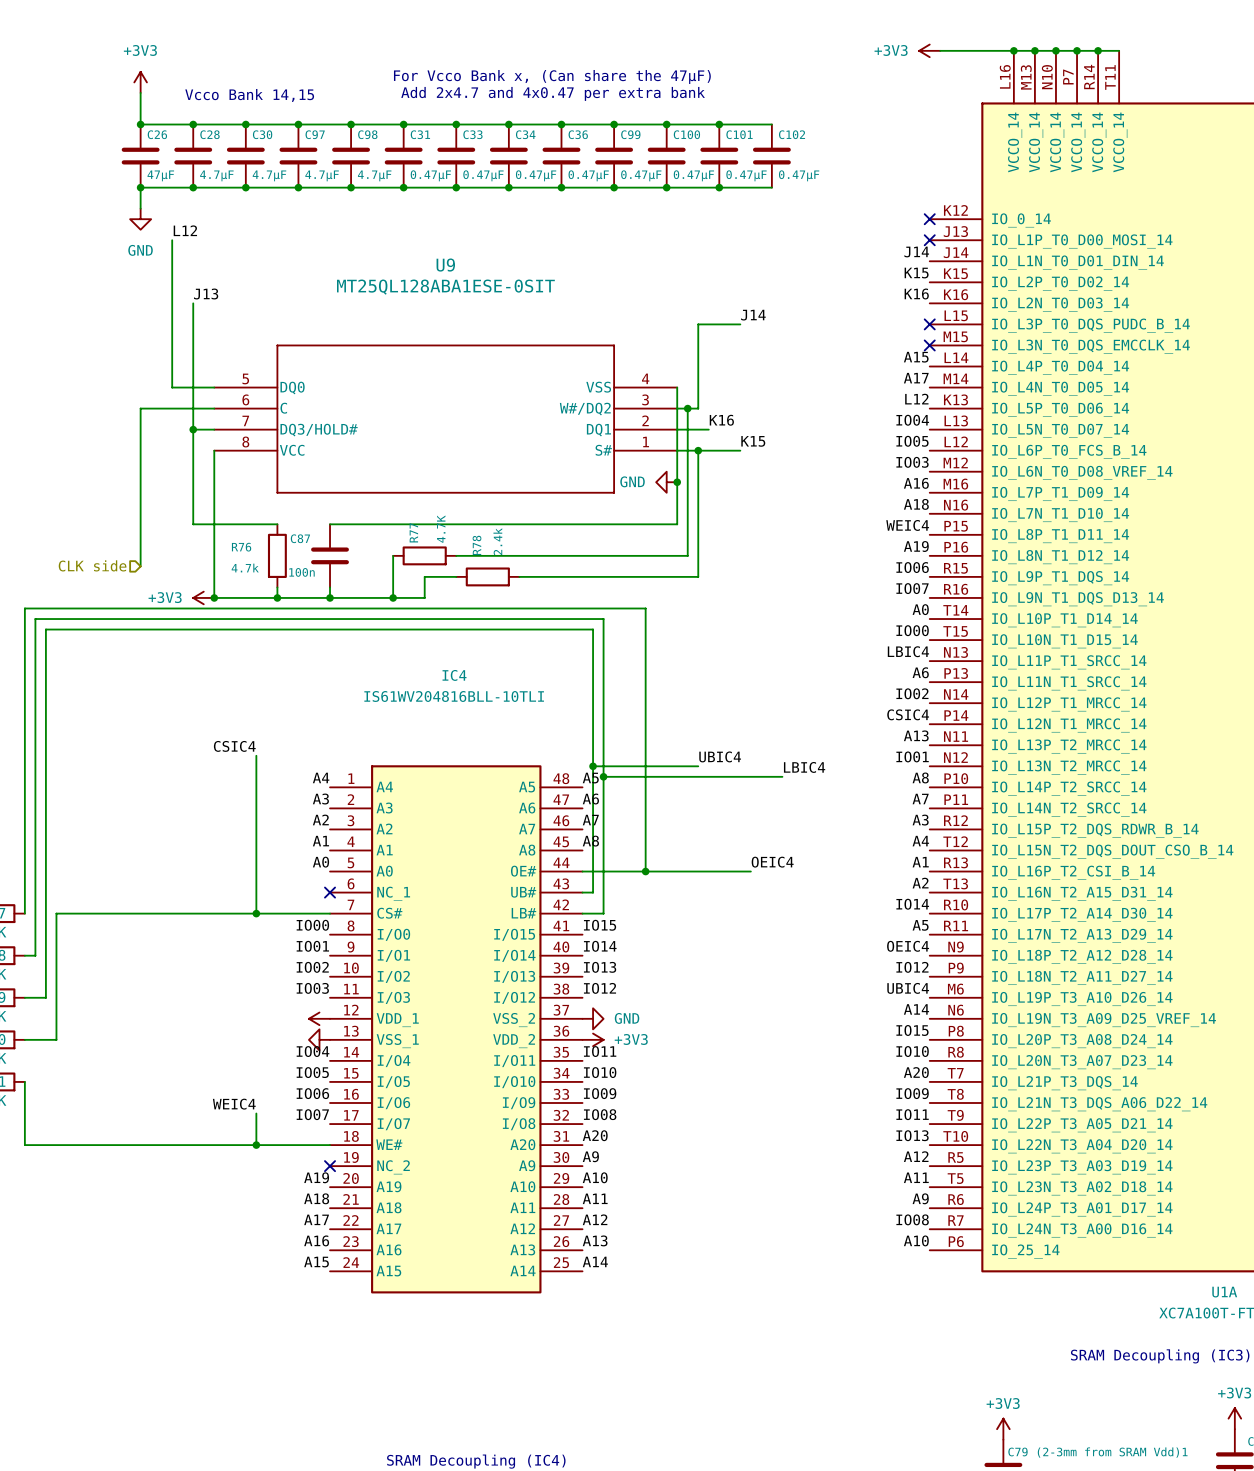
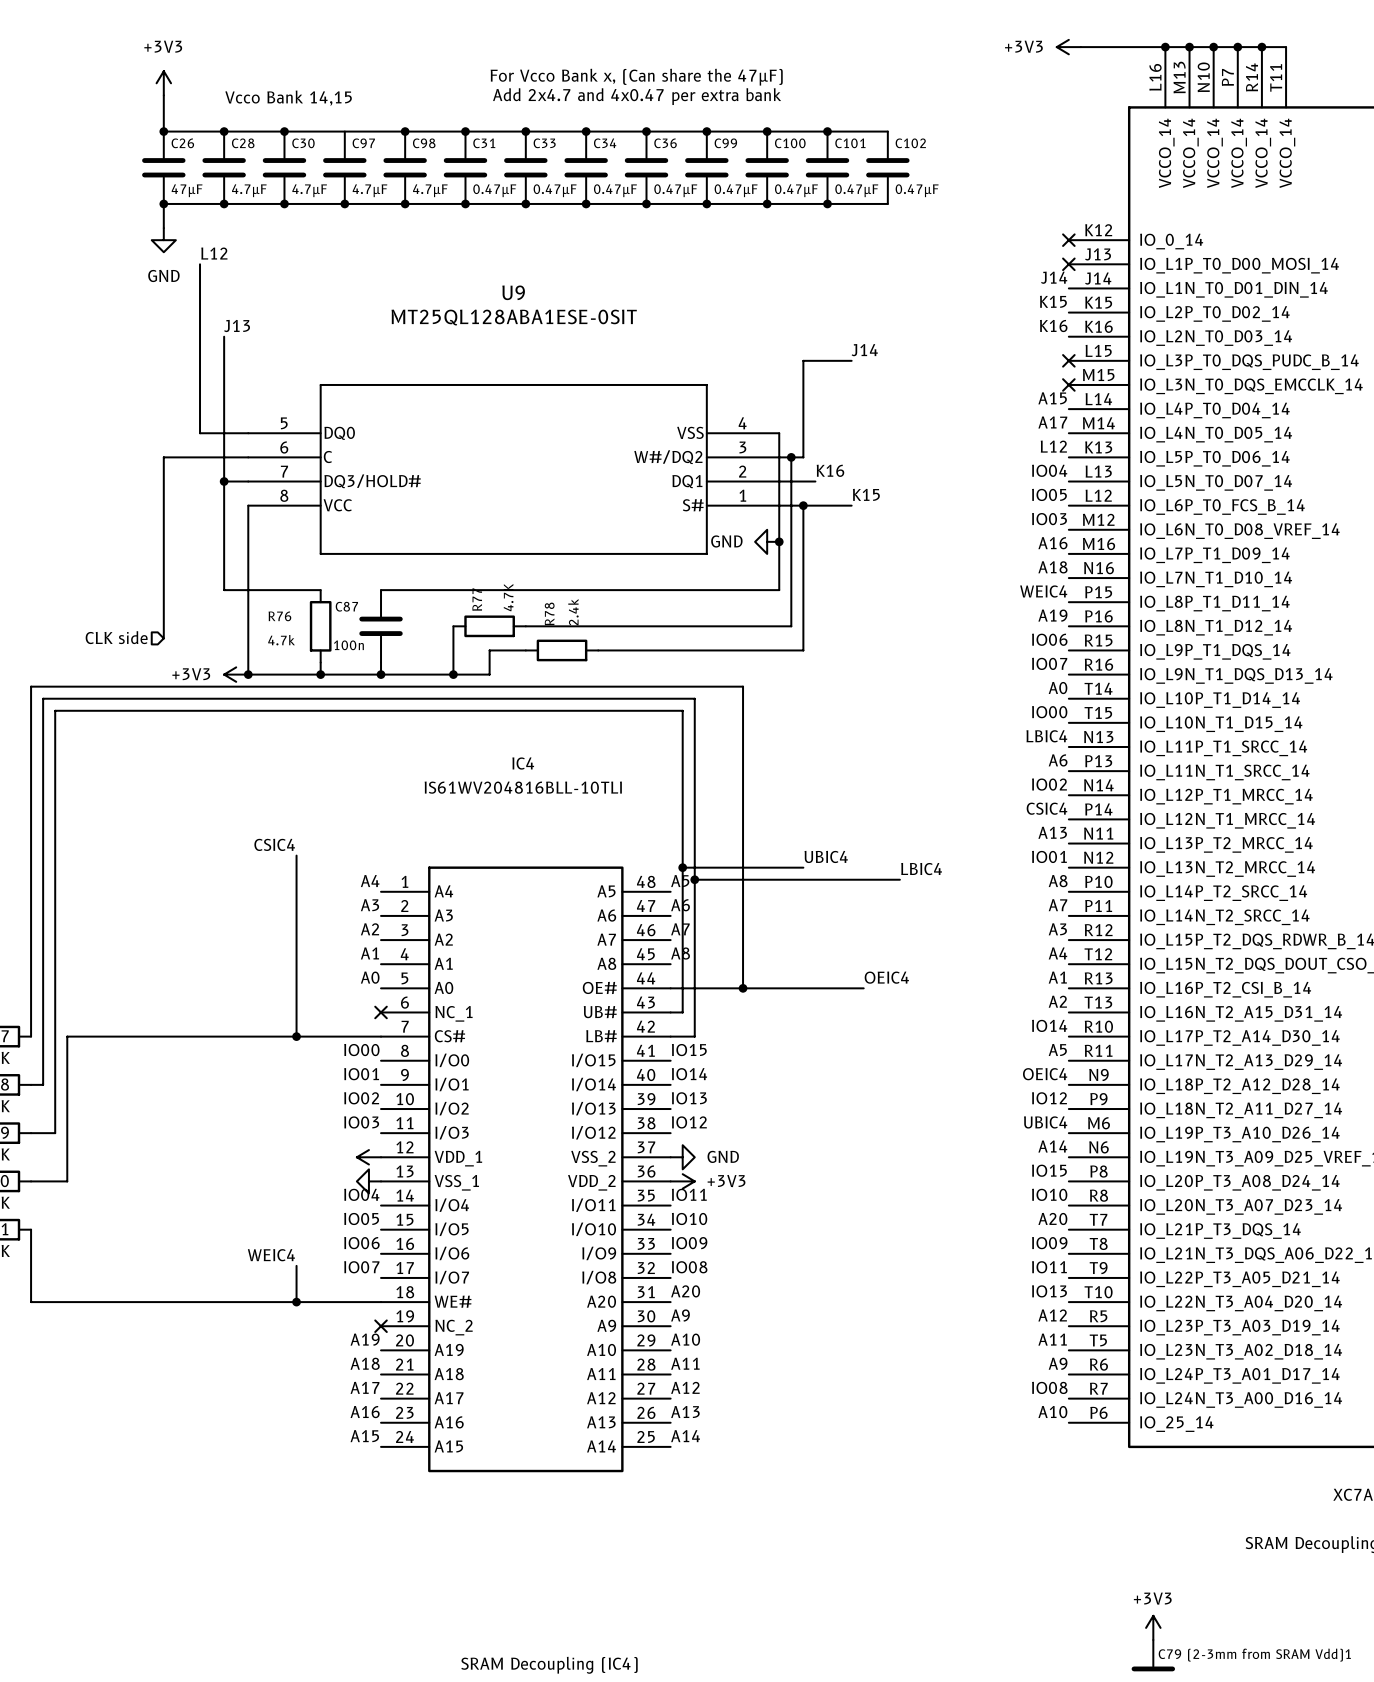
junction: (298, 124) -> none

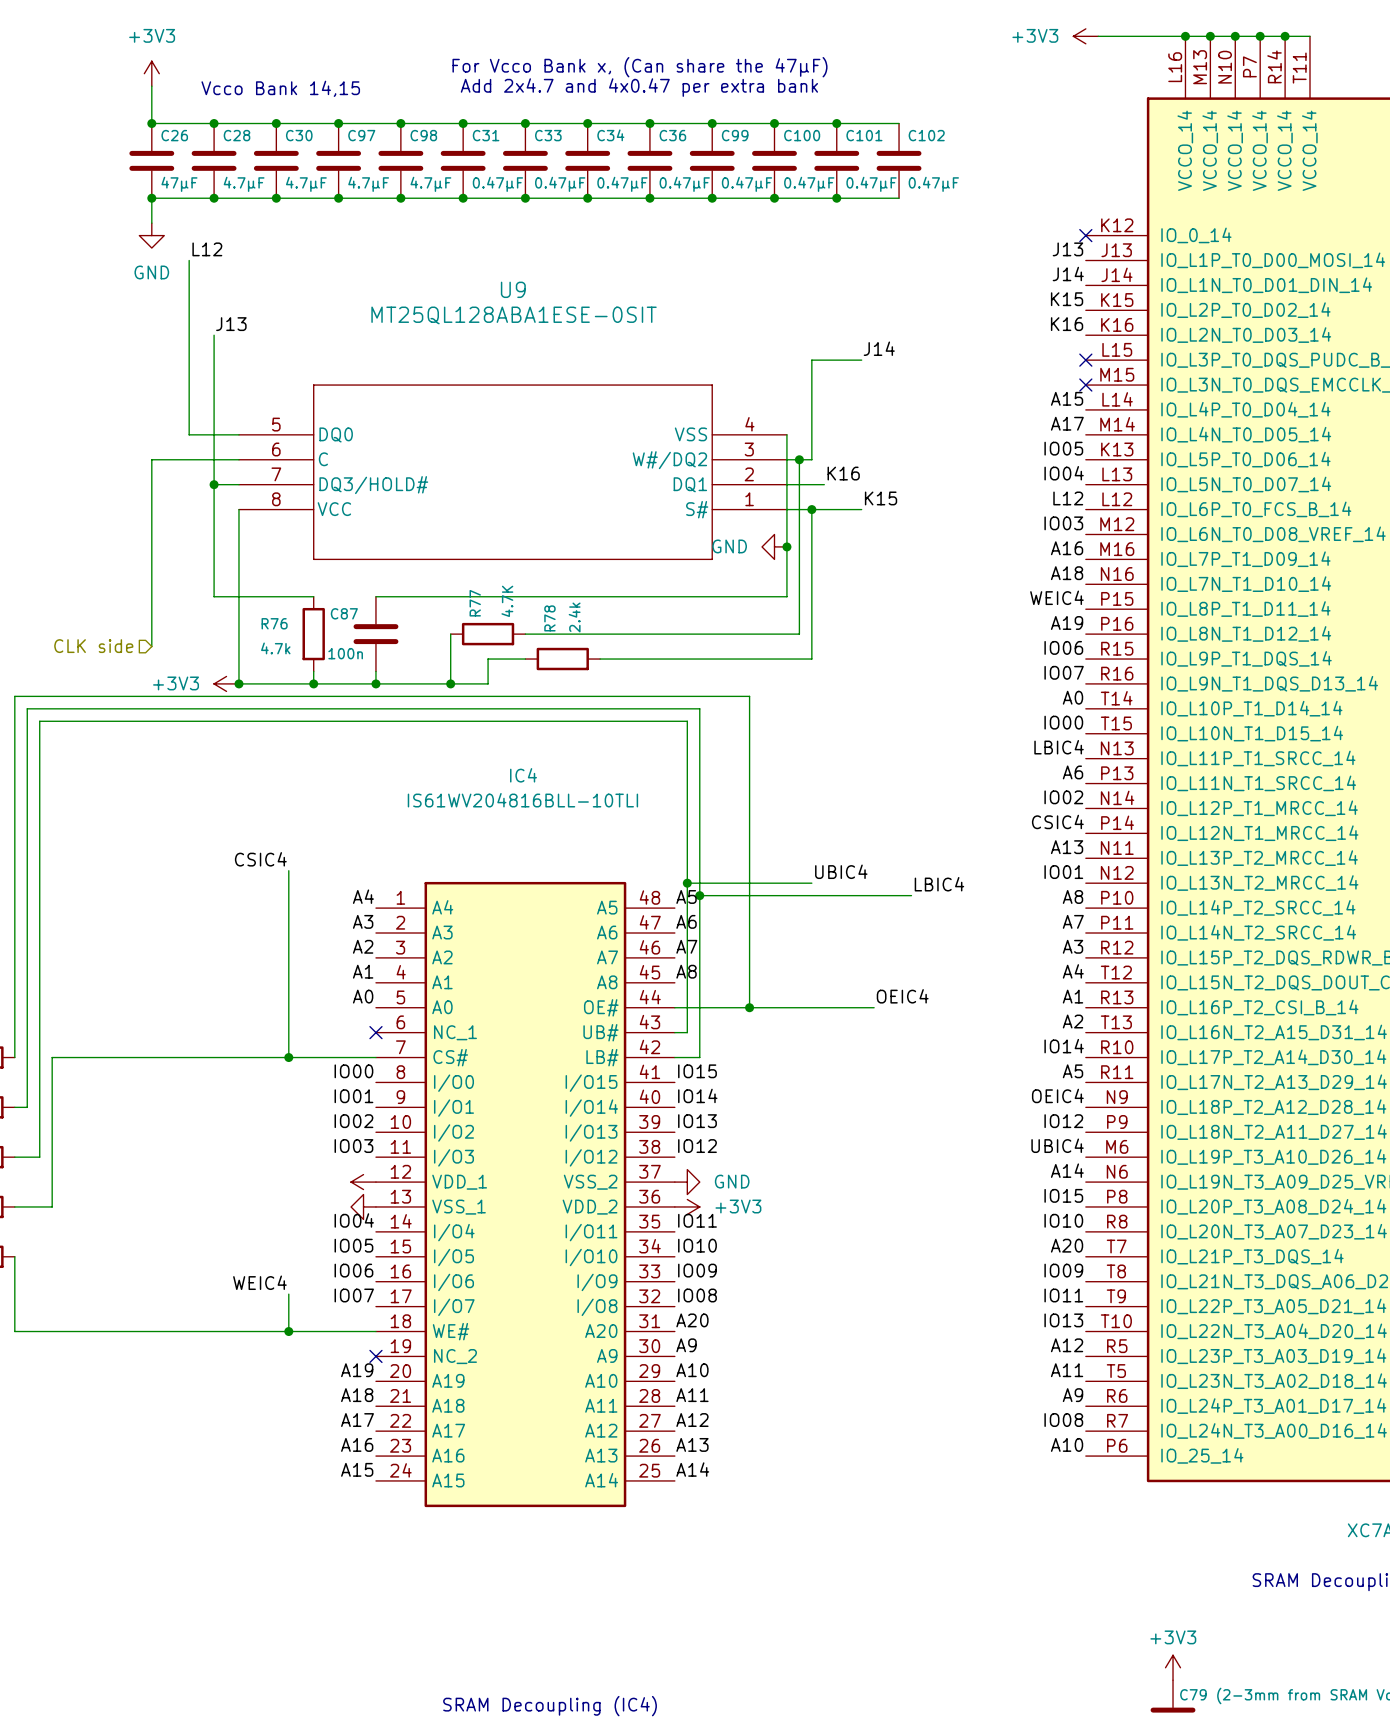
junction: none -> (338, 123)
label: none -> J13 (1067, 249)
no-connect mark: (1068, 264) -> none
label: L12 (1053, 446) -> IO05 (1063, 448)
label: IO05 (1049, 494) -> L12 (1068, 498)

